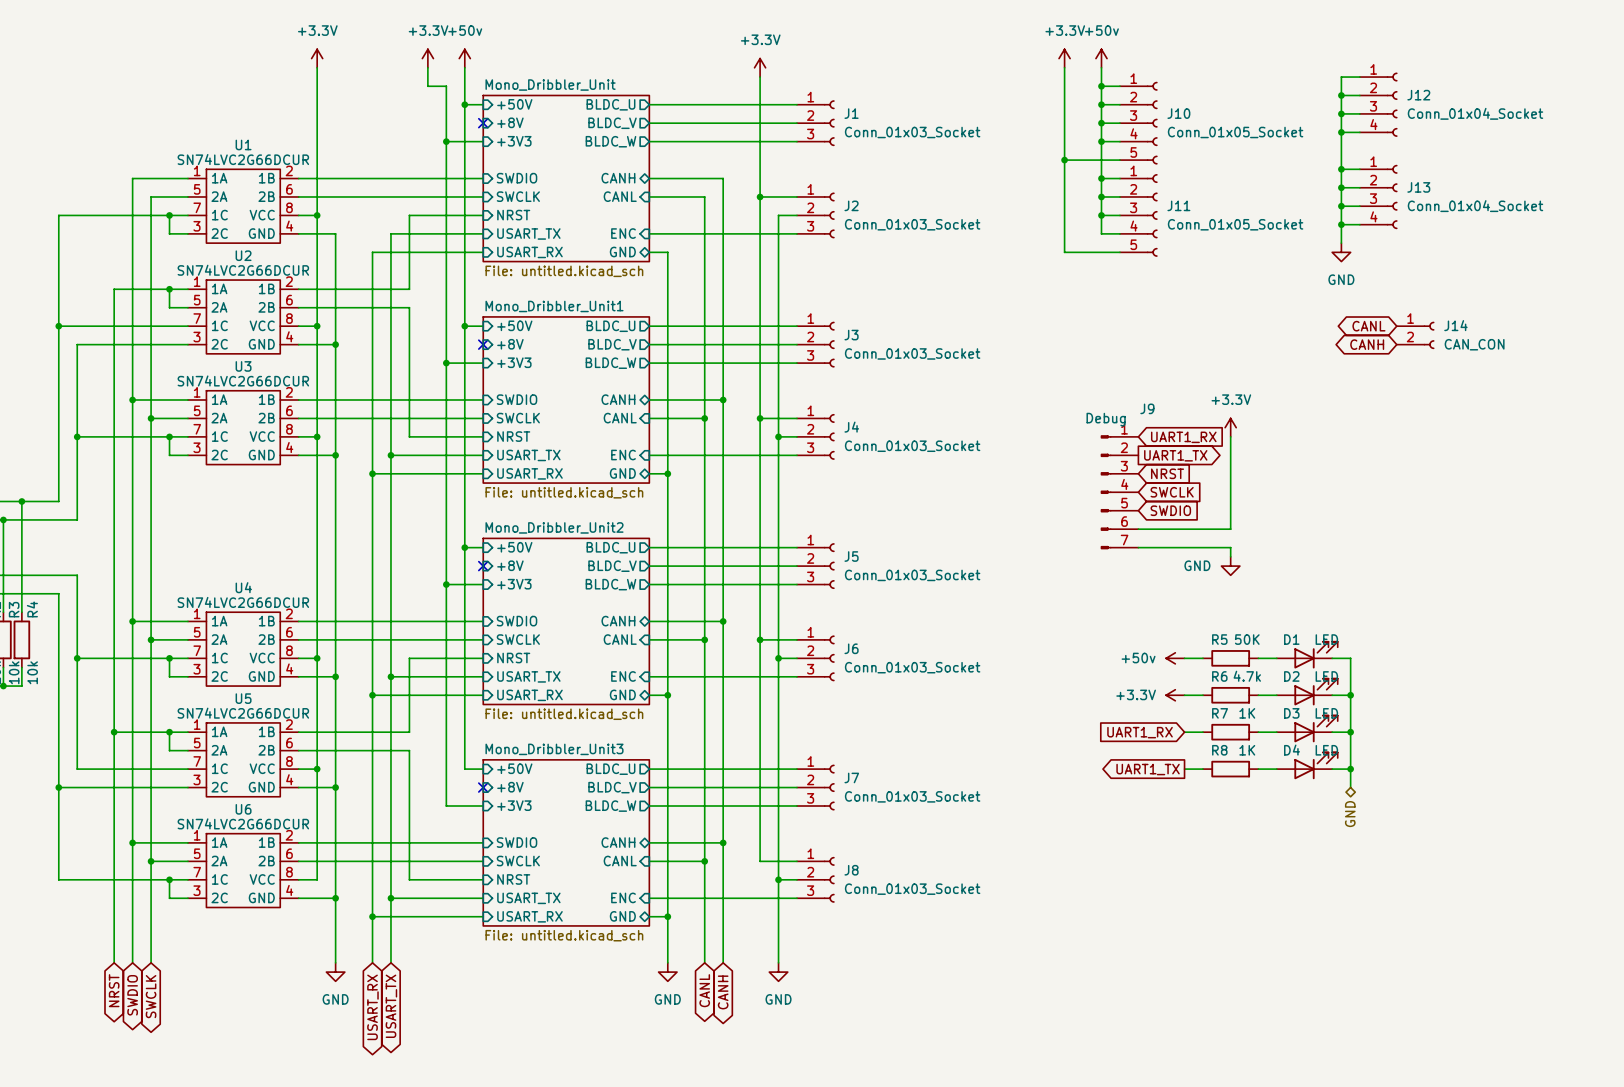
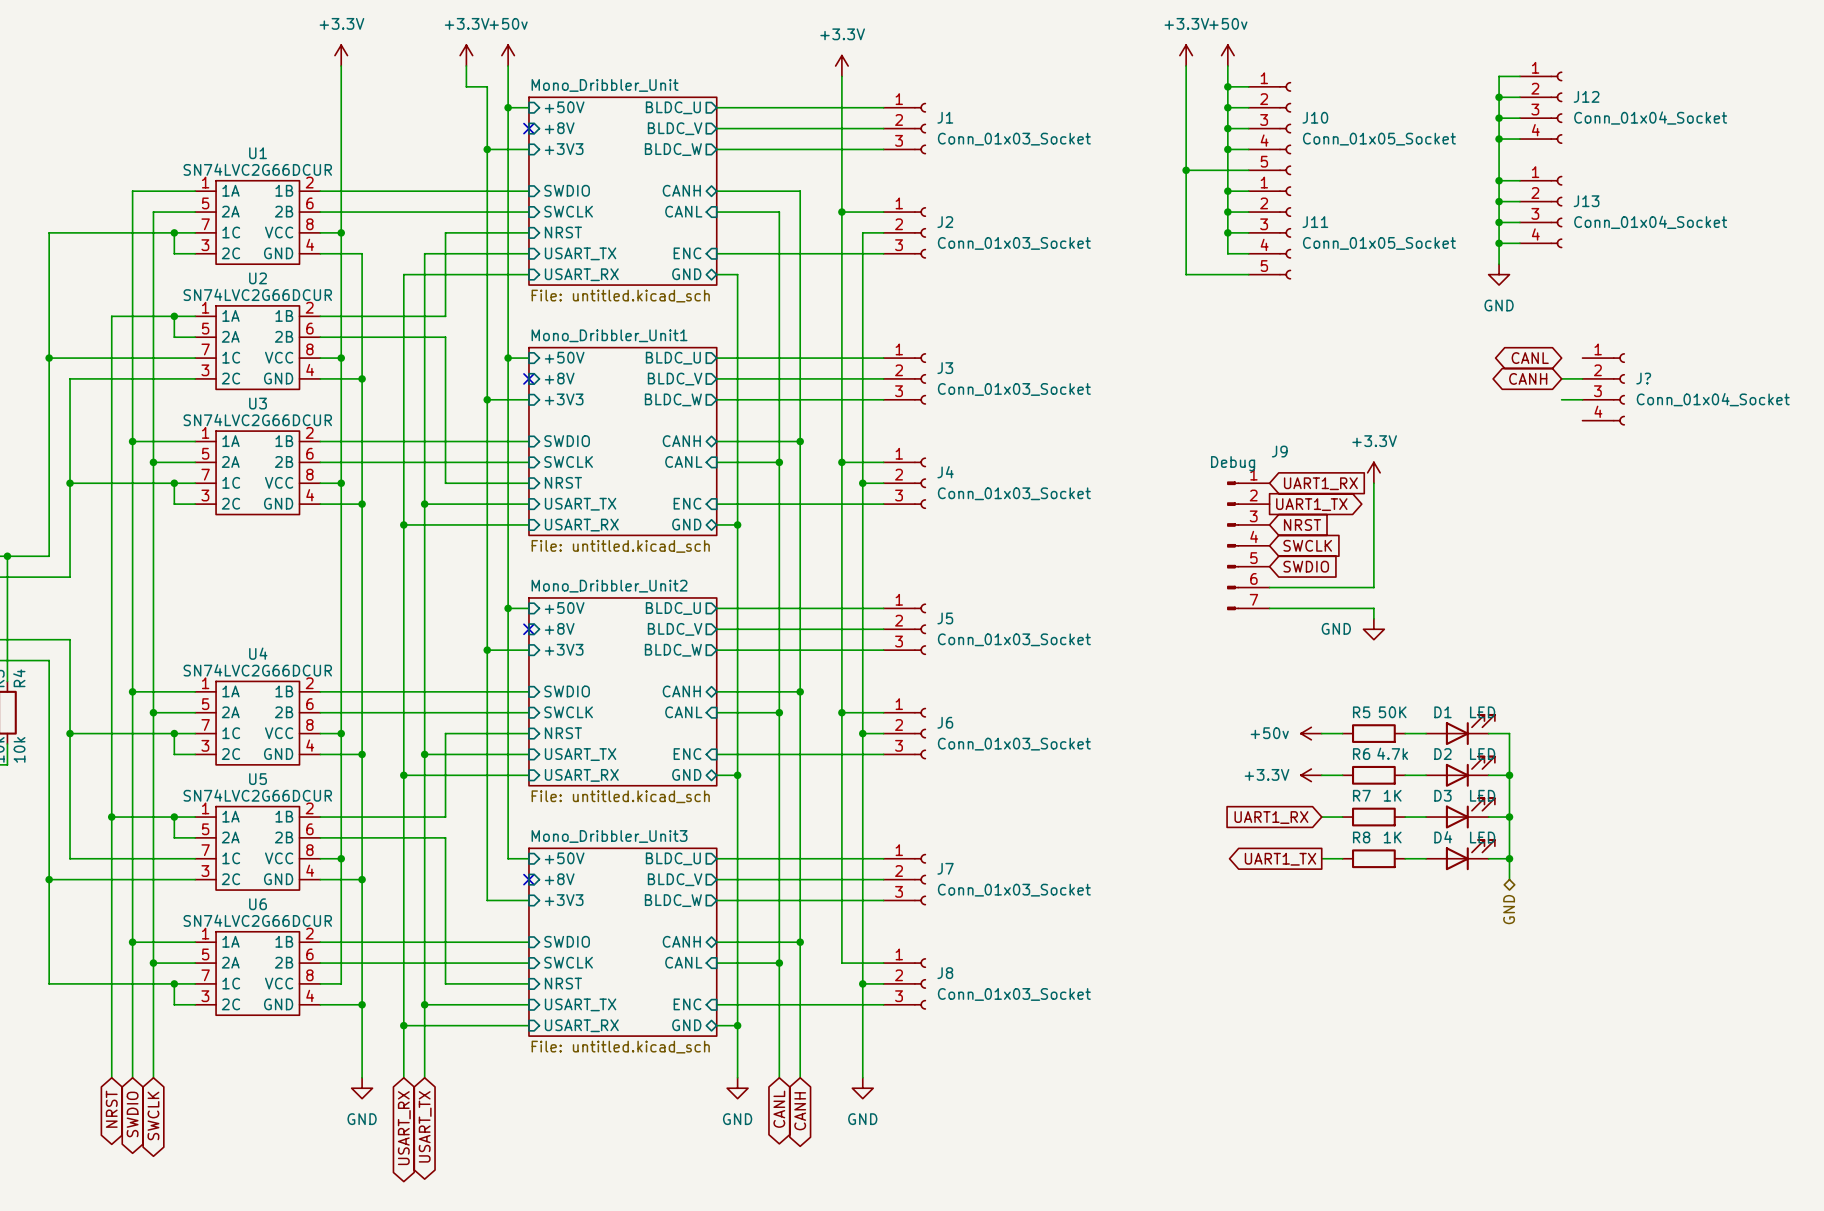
J14: CAN_CON (1415, 335) -> none
J?: none -> Conn_01x04_Socket (1603, 389)
wire: none -> (1561, 399) (1582, 399)

